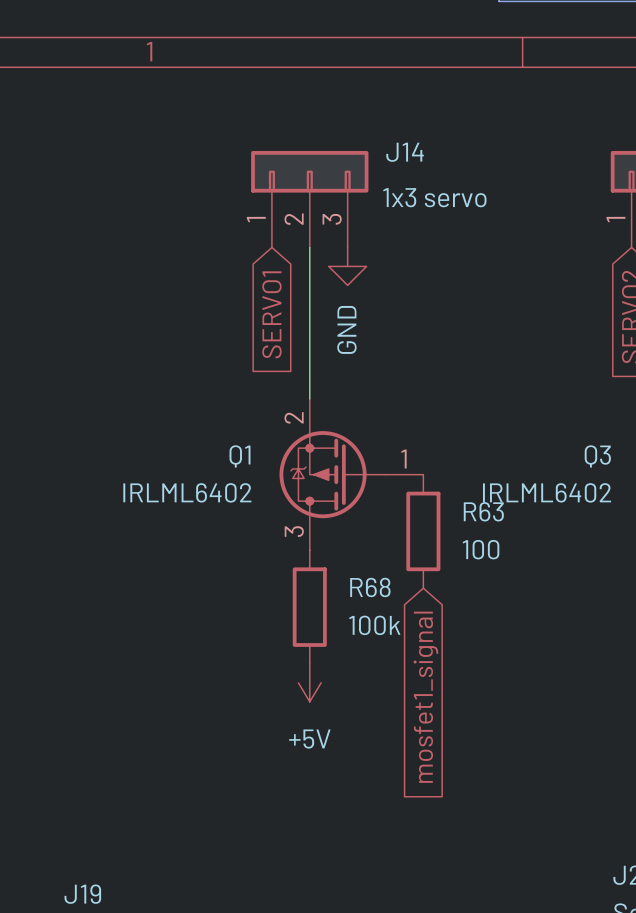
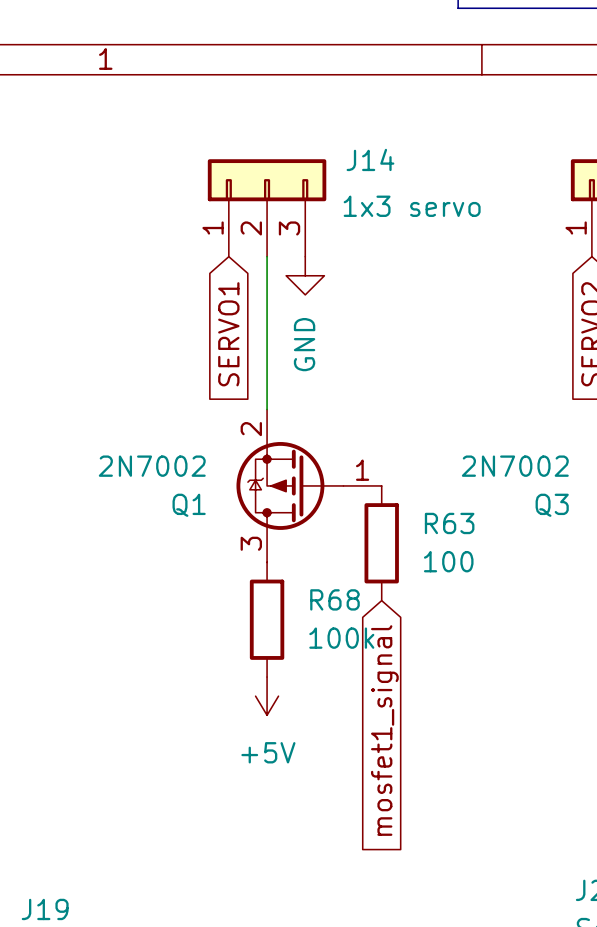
Q1 name position: Q1 (240, 456) -> Q1 (189, 505)
Q3 name position: Q3 (597, 456) -> Q3 (552, 505)
Q1 value: IRLML6402 (187, 492) -> 2N7002 (152, 466)
Q3 value: IRLML6402 (547, 492) -> 2N7002 (515, 466)

